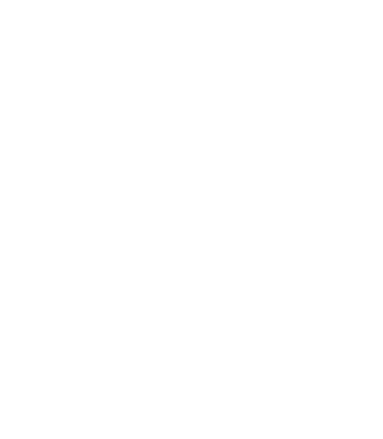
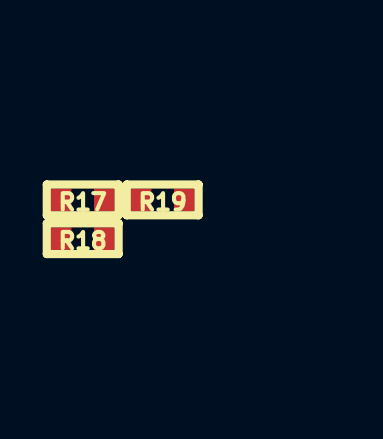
R17: none -> (82, 199)
R19: none -> (162, 199)
R18: none -> (82, 238)

